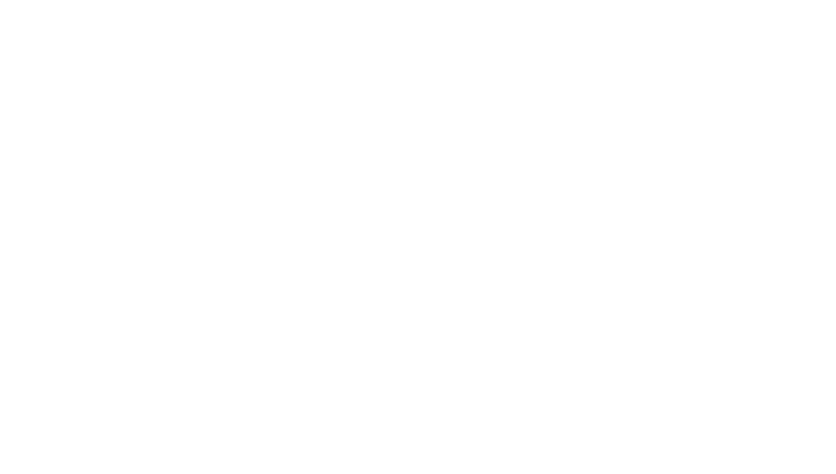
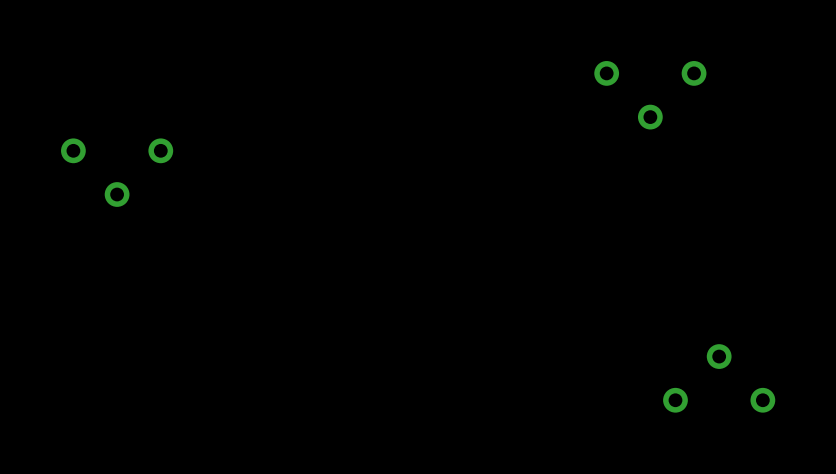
part: none -> (650, 95)
part: none -> (117, 172)
part: none -> (719, 378)

